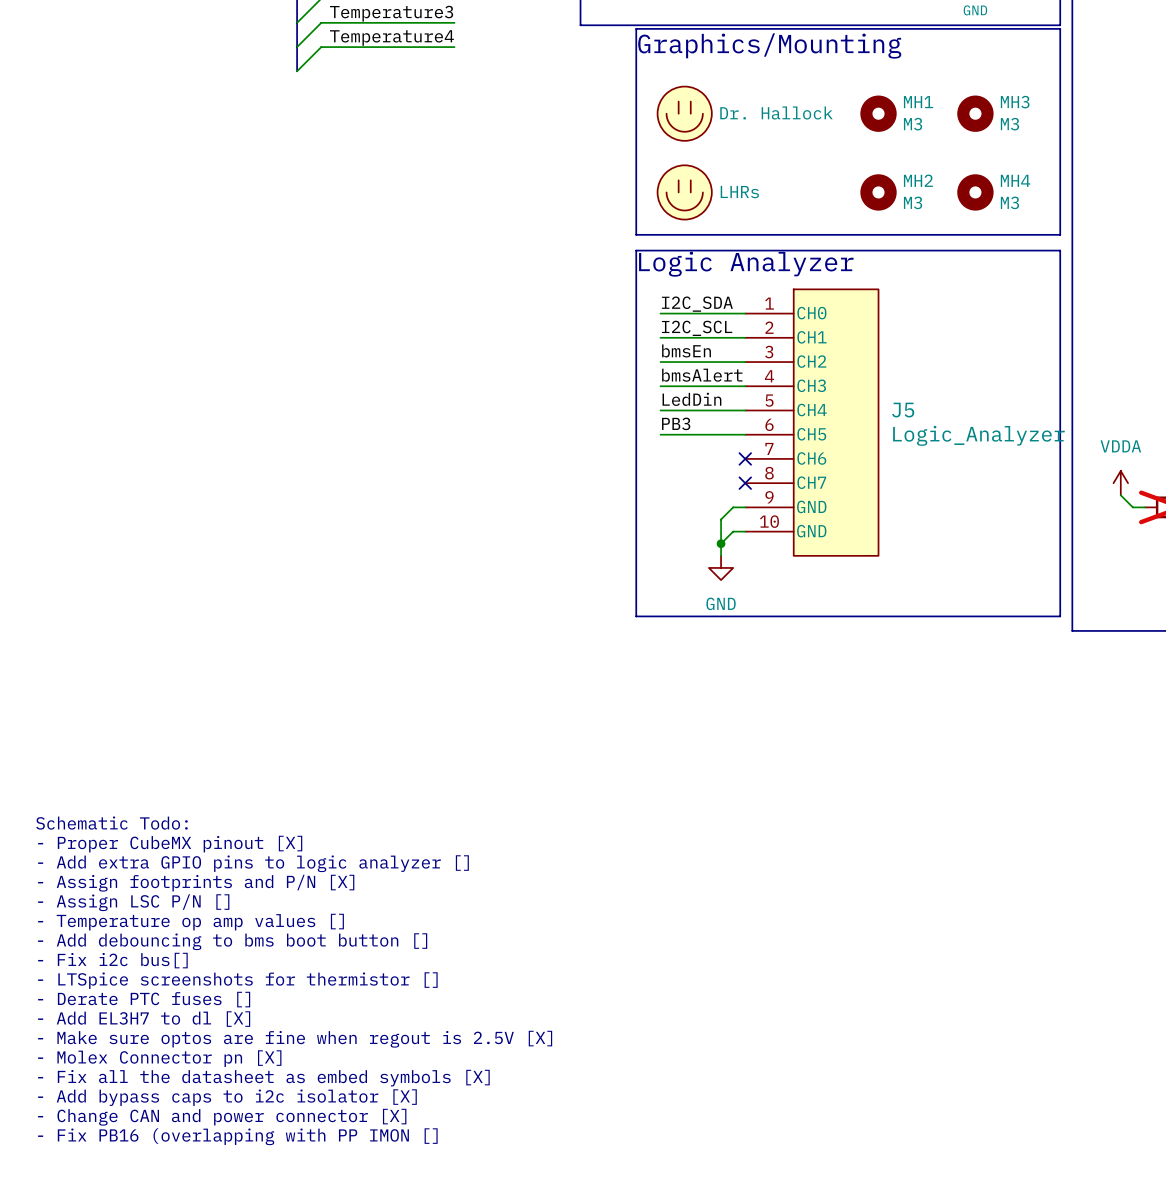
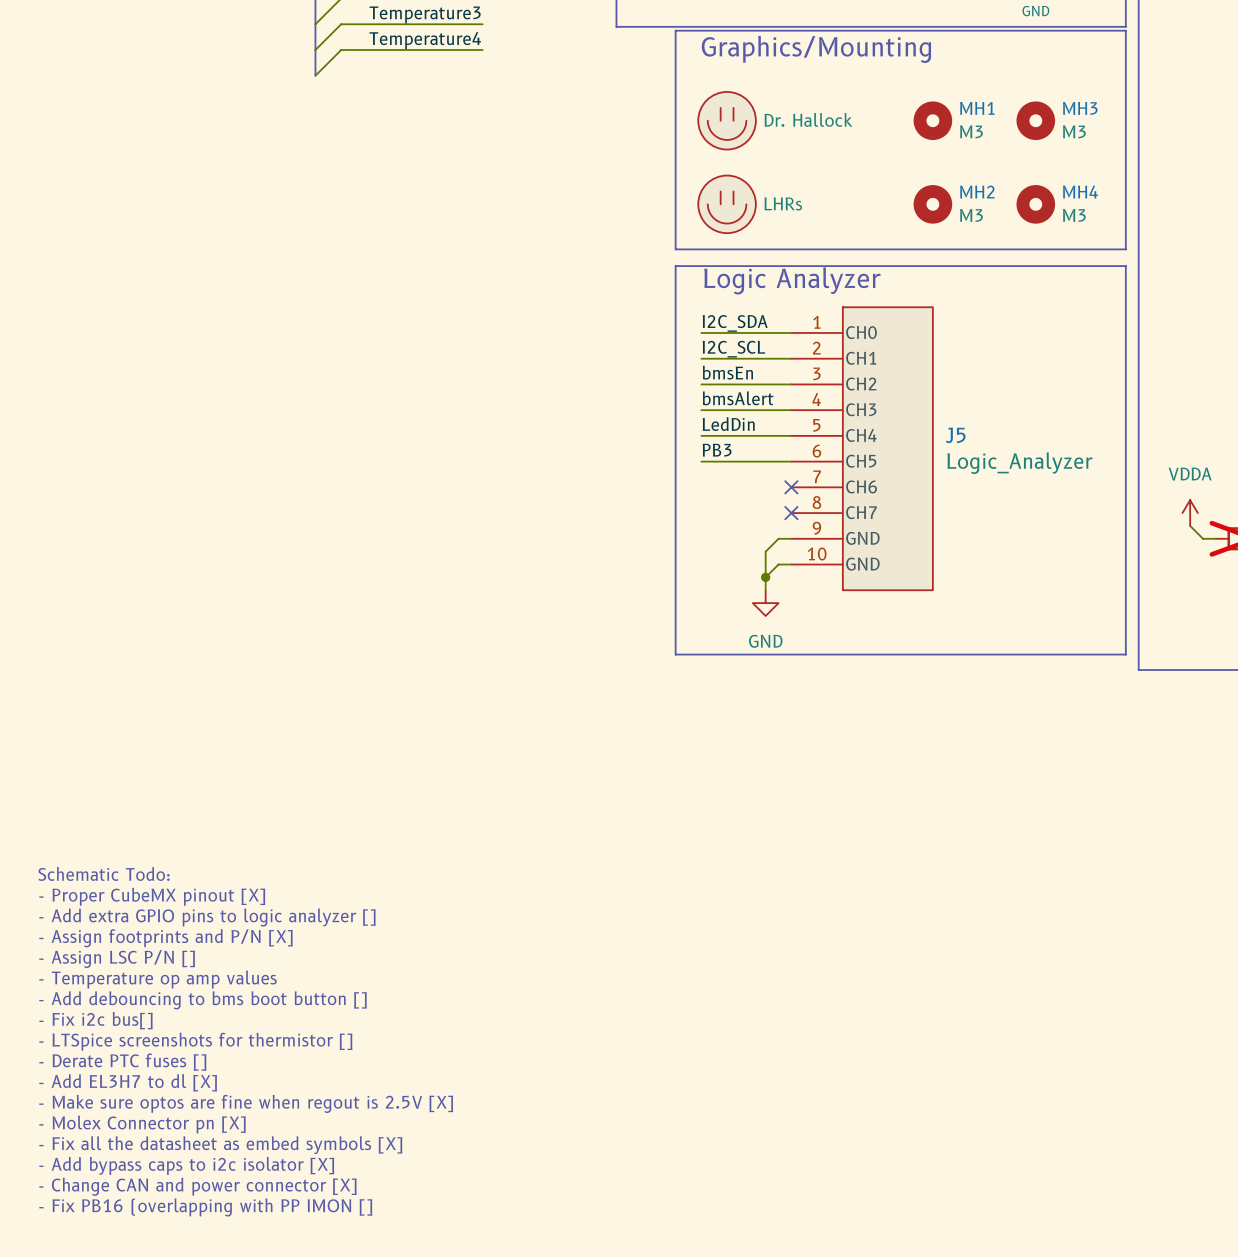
text: - Temperature op amp values [] (191, 922) -> - Temperature op amp values (158, 979)

